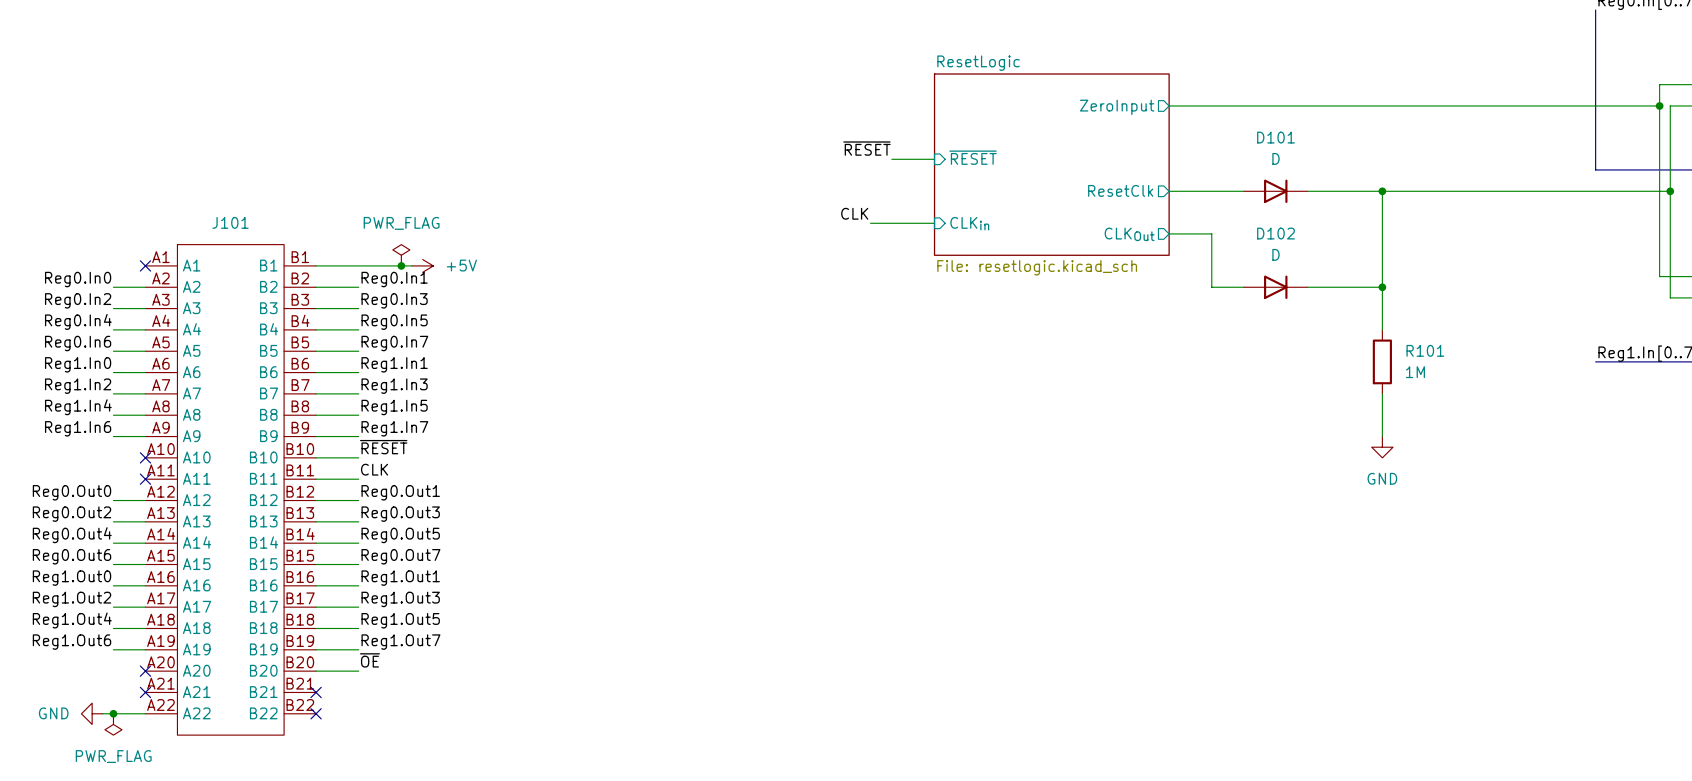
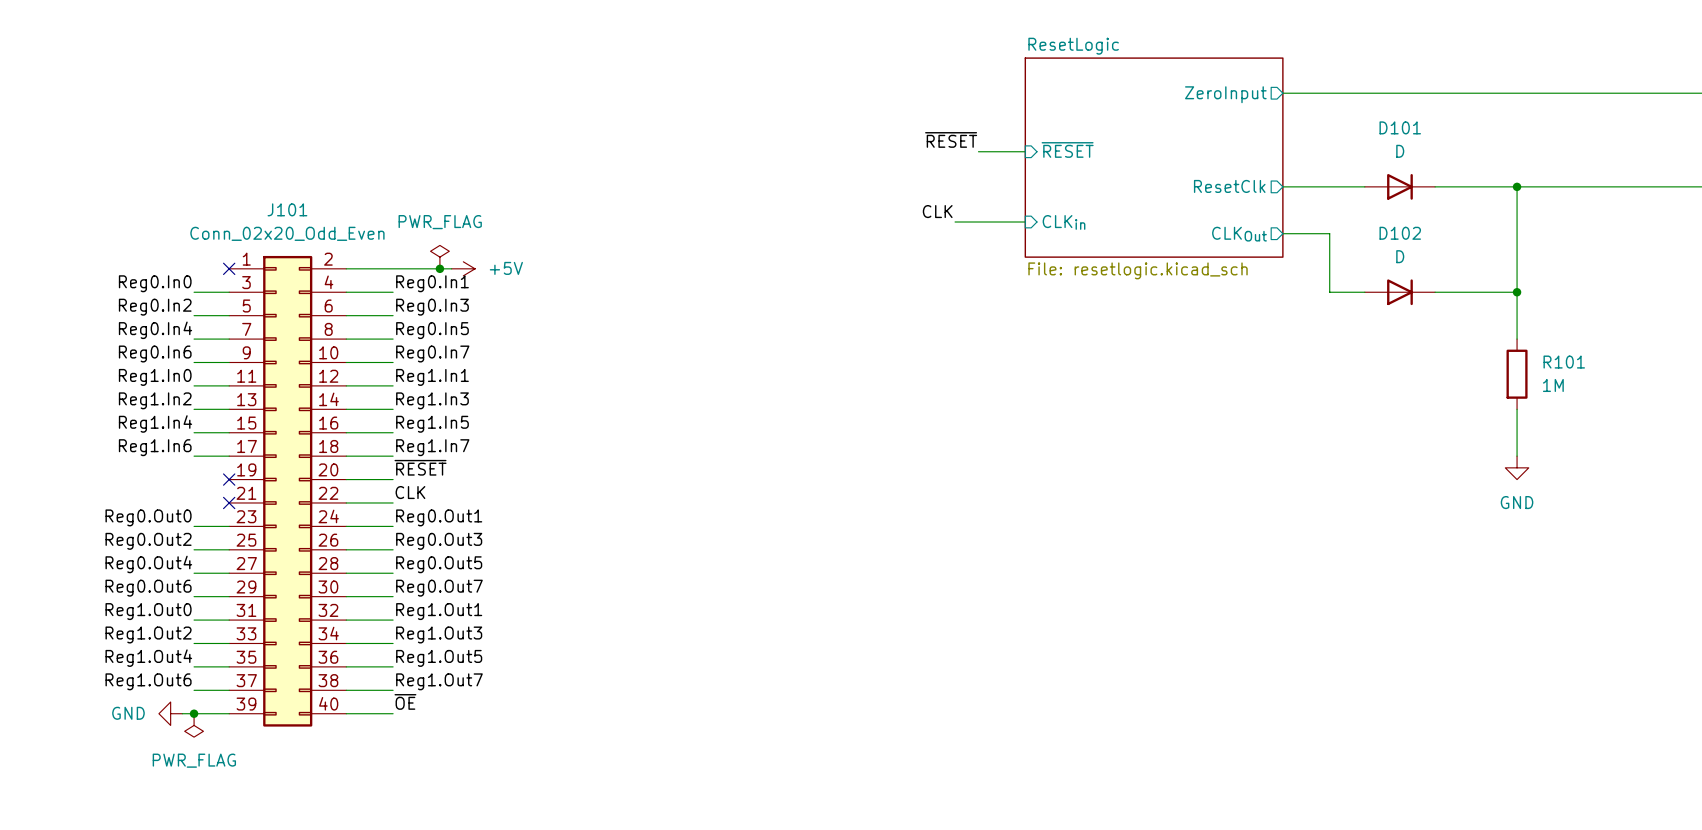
J101 value: none -> Conn_02x20_Odd_Even (287, 233)
J101 symbol: [145, 244, 317, 736] -> [229, 255, 347, 727]
no-connect mark: (145, 265) -> none
no-connect mark: none -> (229, 268)
label position: Reg0.In0 (78, 279) -> Reg0.In0 (155, 283)
wire: (113, 287) (145, 287) -> (194, 292) (229, 292)
label position: Reg0.In2 (78, 300) -> Reg0.In2 (155, 307)
wire: (113, 308) (145, 308) -> (194, 315) (229, 315)
label position: Reg0.In4 (78, 321) -> Reg0.In4 (155, 330)
wire: (113, 329) (145, 329) -> (194, 339) (229, 339)
label position: Reg0.In6 (78, 343) -> Reg0.In6 (155, 353)
wire: (113, 351) (145, 351) -> (194, 362) (229, 362)
label position: Reg1.In0 (78, 364) -> Reg1.In0 (155, 377)
wire: (113, 372) (145, 372) -> (194, 385) (229, 385)
label position: Reg1.In2 (78, 386) -> Reg1.In2 (155, 400)
wire: (113, 393) (145, 393) -> (194, 409) (229, 409)
label position: Reg1.In4 (78, 407) -> Reg1.In4 (155, 423)
wire: (113, 415) (145, 415) -> (194, 432) (229, 432)
label position: Reg1.In6 (78, 428) -> Reg1.In6 (155, 447)
wire: (113, 436) (145, 436) -> (194, 456) (229, 456)
no-connect mark: (145, 457) -> none
no-connect mark: none -> (229, 479)
no-connect mark: (145, 479) -> none
no-connect mark: none -> (229, 502)
label position: Reg0.Out0 (72, 492) -> Reg0.Out0 (148, 517)
wire: (113, 500) (145, 500) -> (194, 526) (229, 526)
label position: Reg0.Out2 (72, 514) -> Reg0.Out2 (148, 541)
wire: (113, 521) (145, 521) -> (194, 549) (229, 549)
label position: Reg0.Out4 (72, 535) -> Reg0.Out4 (148, 564)
wire: (113, 543) (145, 543) -> (194, 573) (229, 573)
label position: Reg0.Out6 (72, 556) -> Reg0.Out6 (148, 588)
wire: (113, 564) (145, 564) -> (194, 596) (229, 596)
label position: Reg1.Out0 (72, 578) -> Reg1.Out0 (148, 611)
wire: (113, 585) (145, 585) -> (194, 620) (229, 620)
label position: Reg1.Out2 (72, 599) -> Reg1.Out2 (148, 634)
wire: (113, 607) (145, 607) -> (194, 643) (229, 643)
label position: Reg1.Out4 (72, 620) -> Reg1.Out4 (148, 658)
wire: (113, 628) (145, 628) -> (194, 666) (229, 666)
label position: Reg1.Out6 (72, 642) -> Reg1.Out6 (148, 681)
wire: (113, 649) (145, 649) -> (194, 690) (229, 690)
no-connect mark: (145, 671) -> none
junction: none -> (194, 713)
no-connect mark: (145, 692) -> none
no-connect mark: (316, 692) -> none
power symbol position: GND (92, 713) -> GND (170, 713)
wire: (102, 713) (145, 713) -> (182, 713) (229, 713)
junction: (113, 713) -> none
no-connect mark: (316, 713) -> none
power symbol position: PWR_FLAG (113, 724) -> PWR_FLAG (194, 725)

